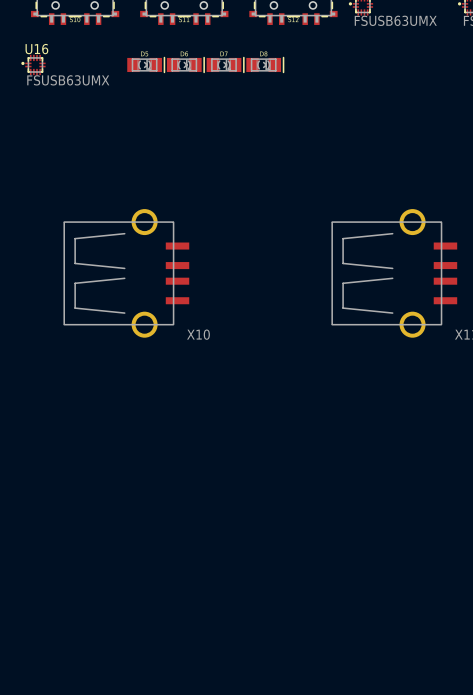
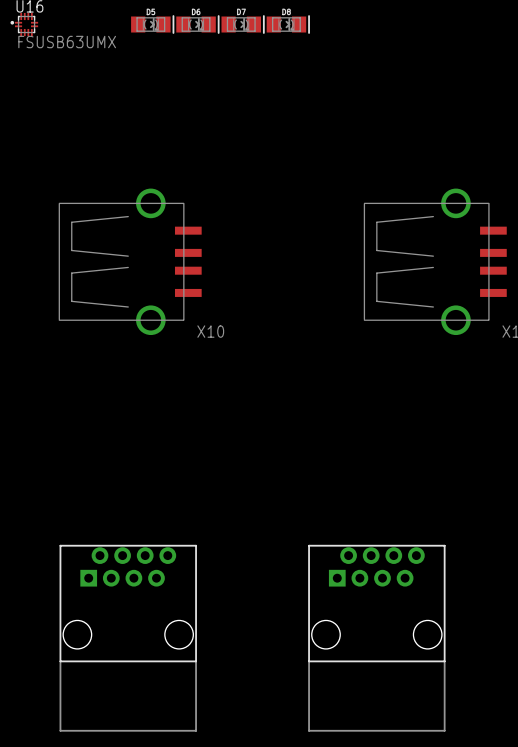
part: none -> (128, 638)
part: none -> (376, 638)

